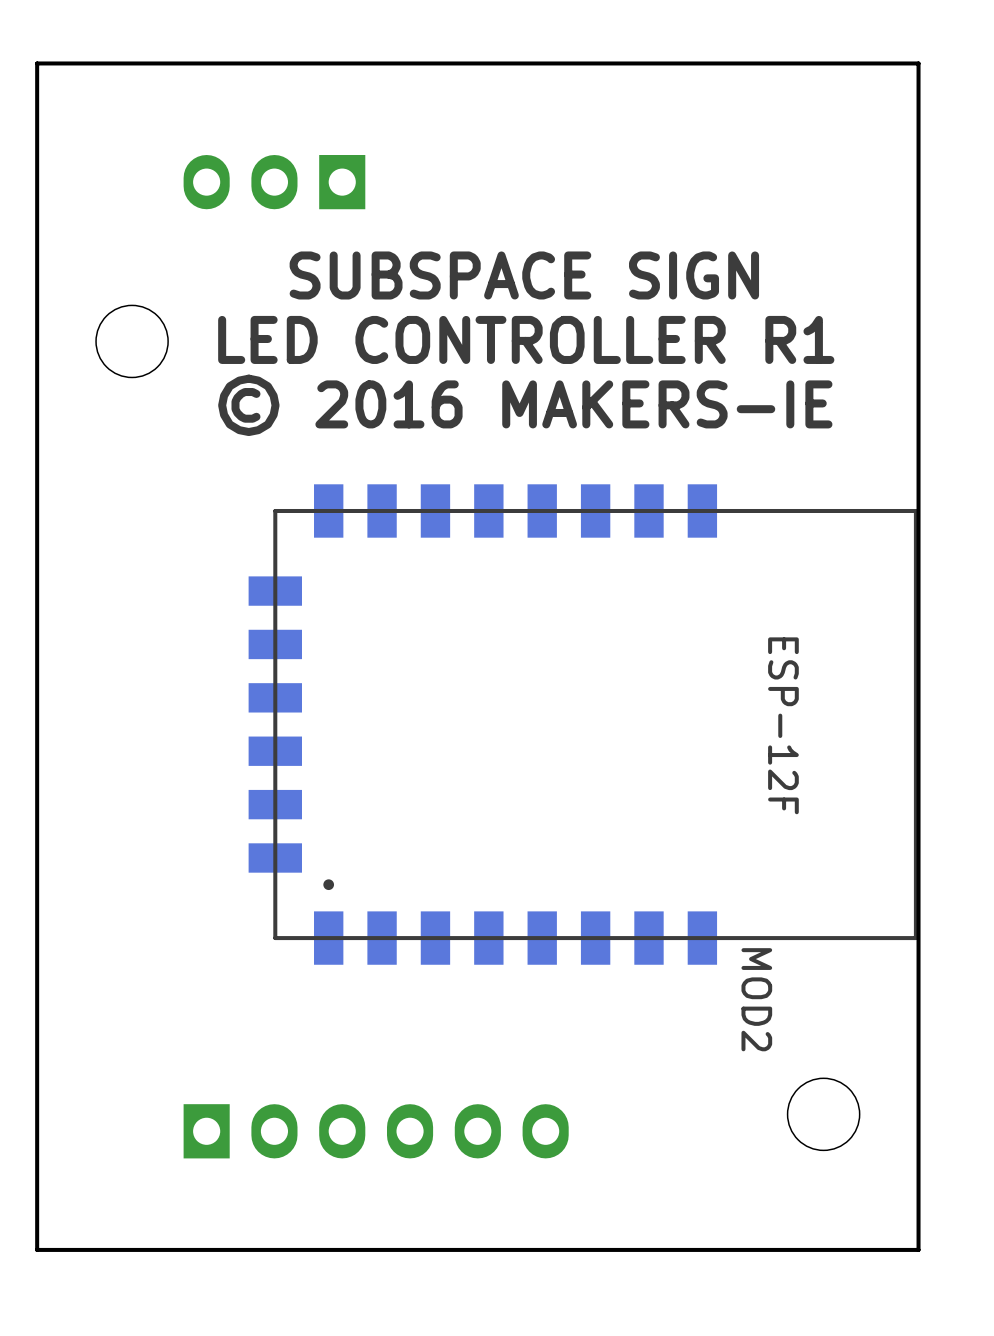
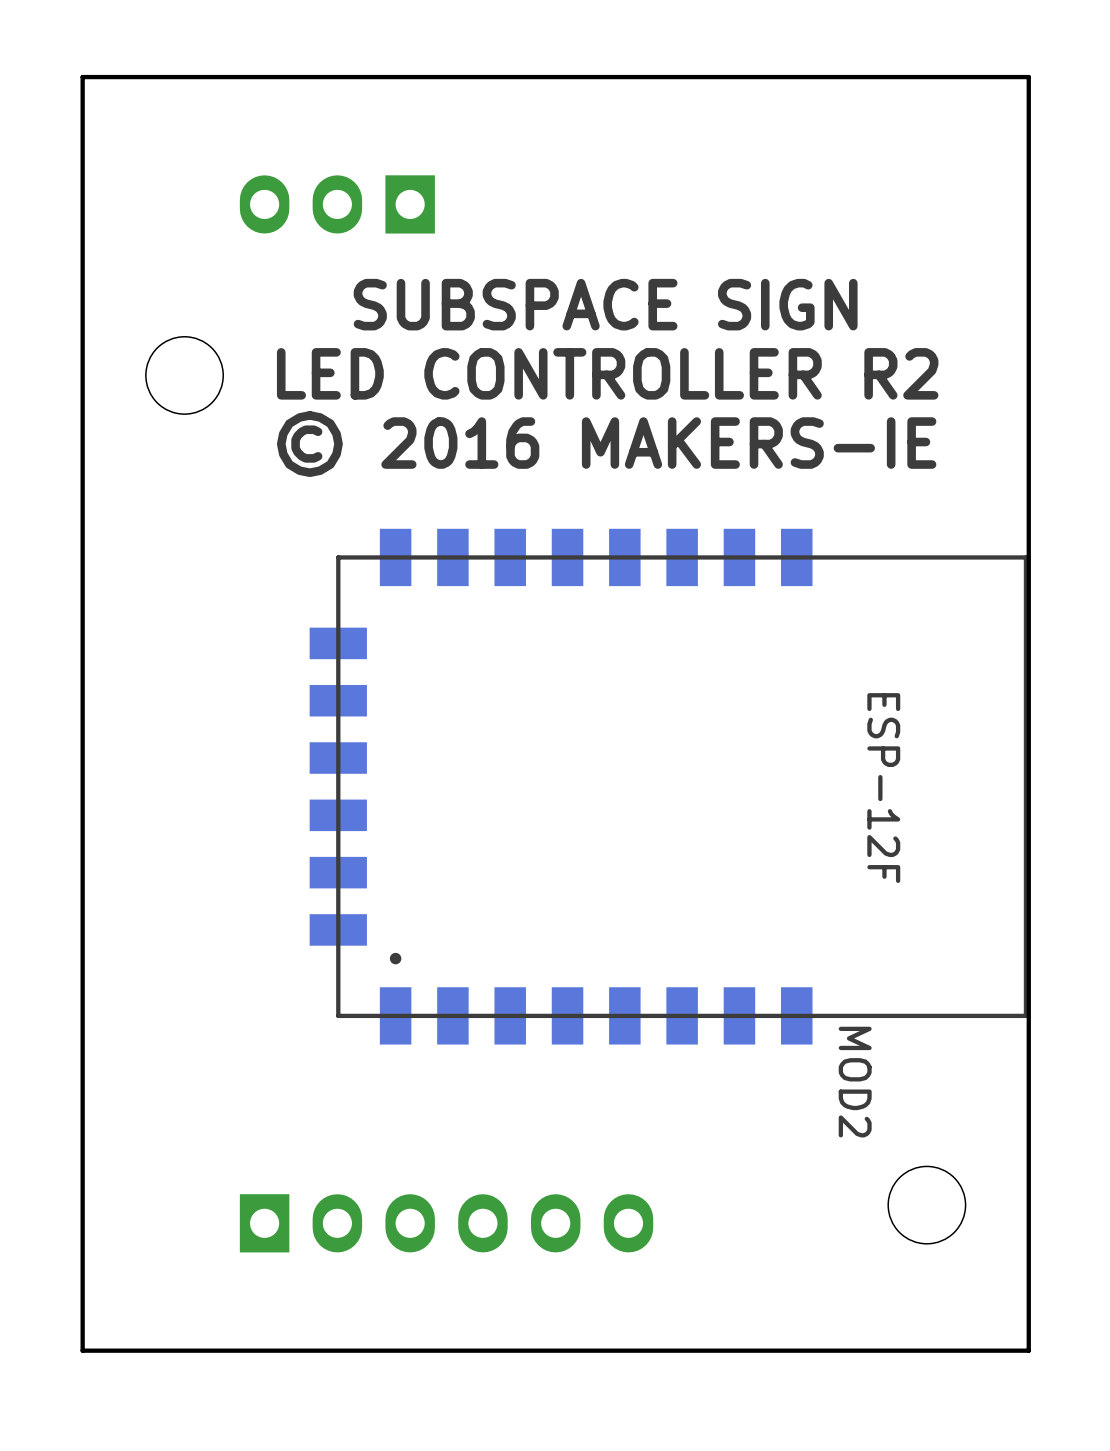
text: LED CONTROLLER R1 (526, 339) -> LED CONTROLLER R2 (607, 373)

